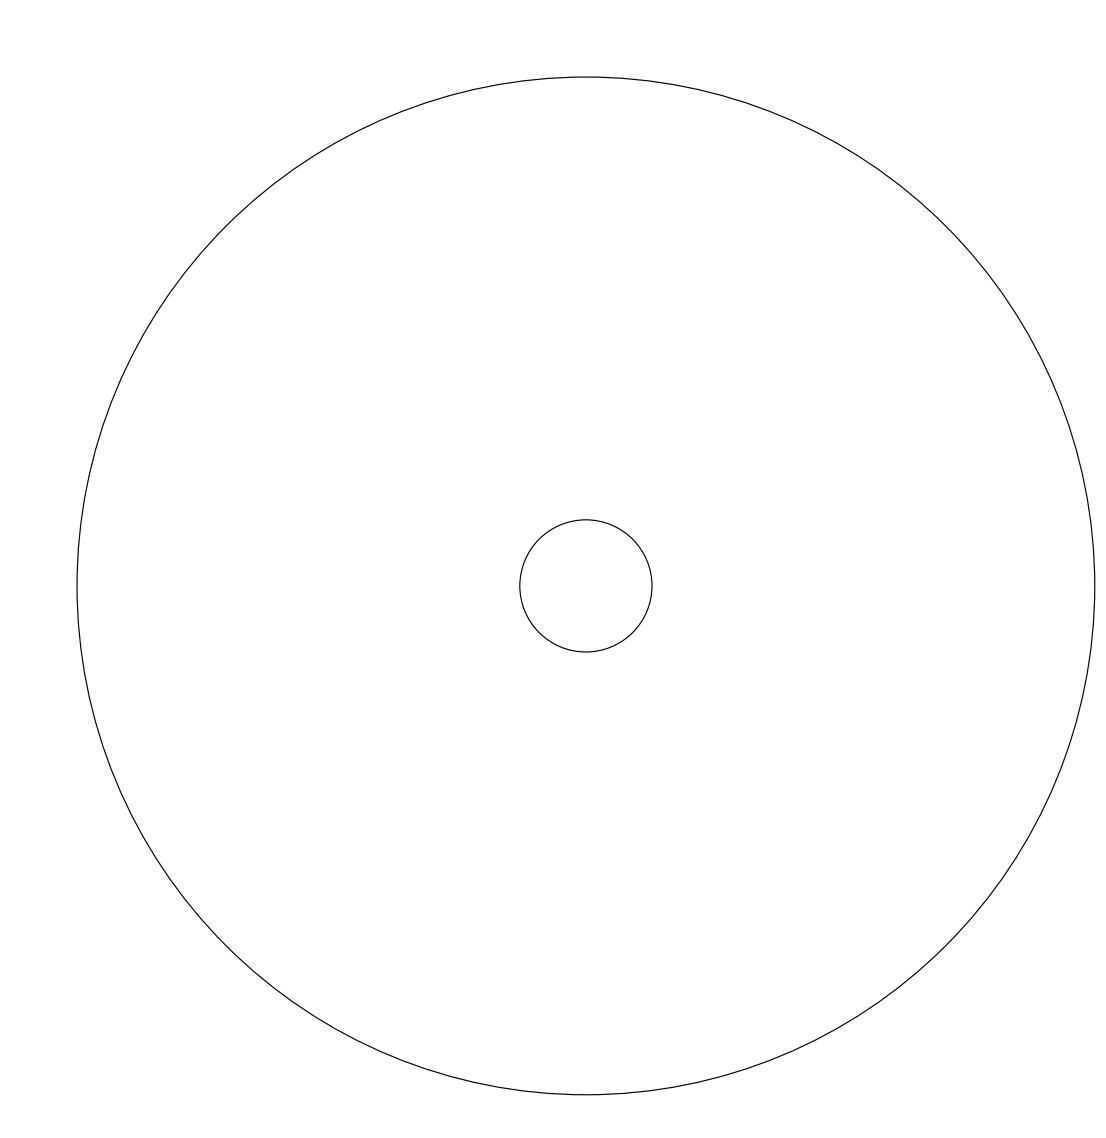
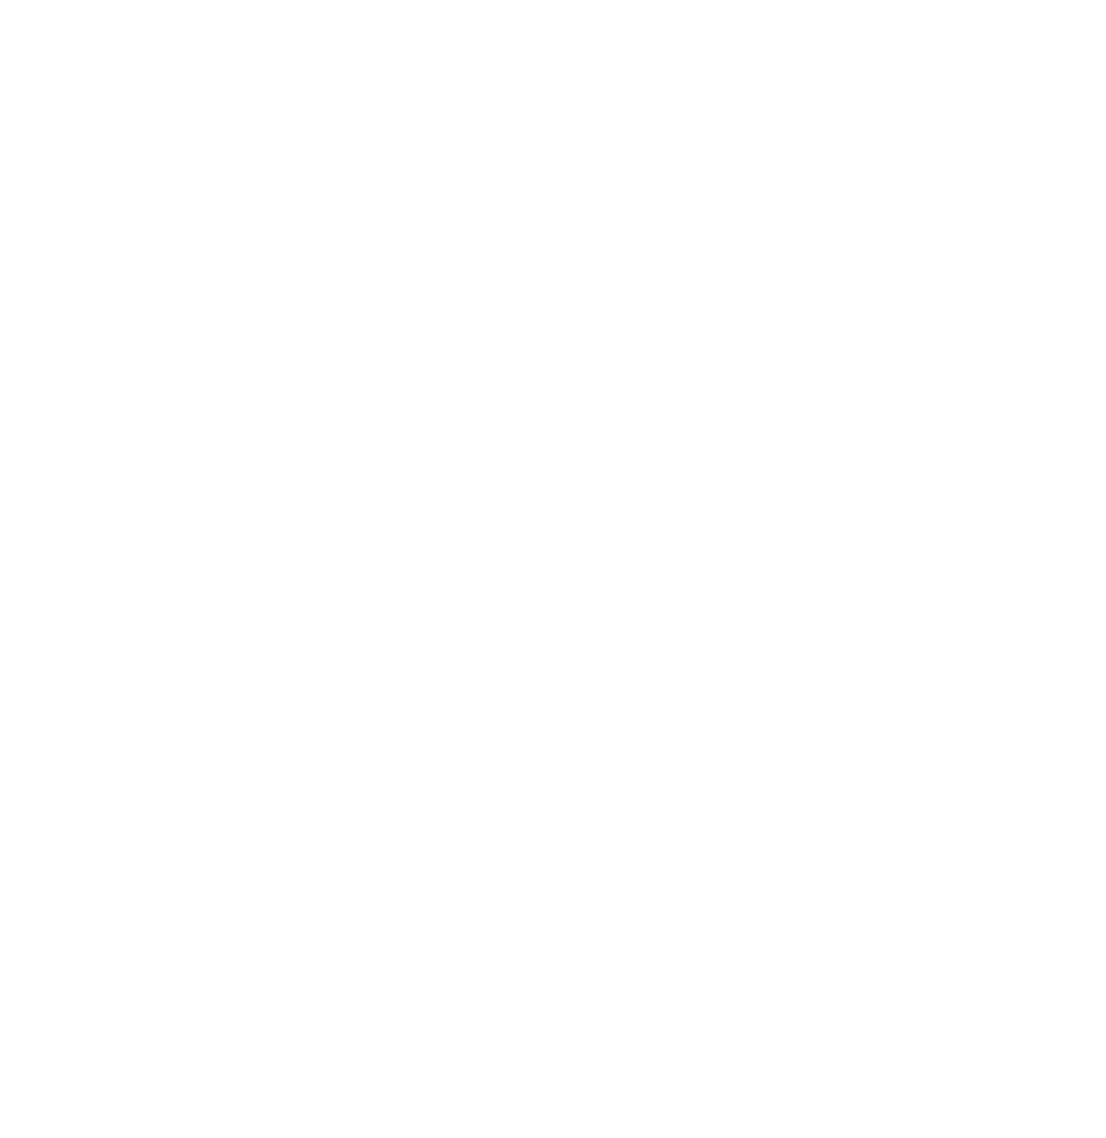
round board edge: [77, 77, 1095, 1095] -> none
round board edge: [519, 519, 652, 652] -> none

